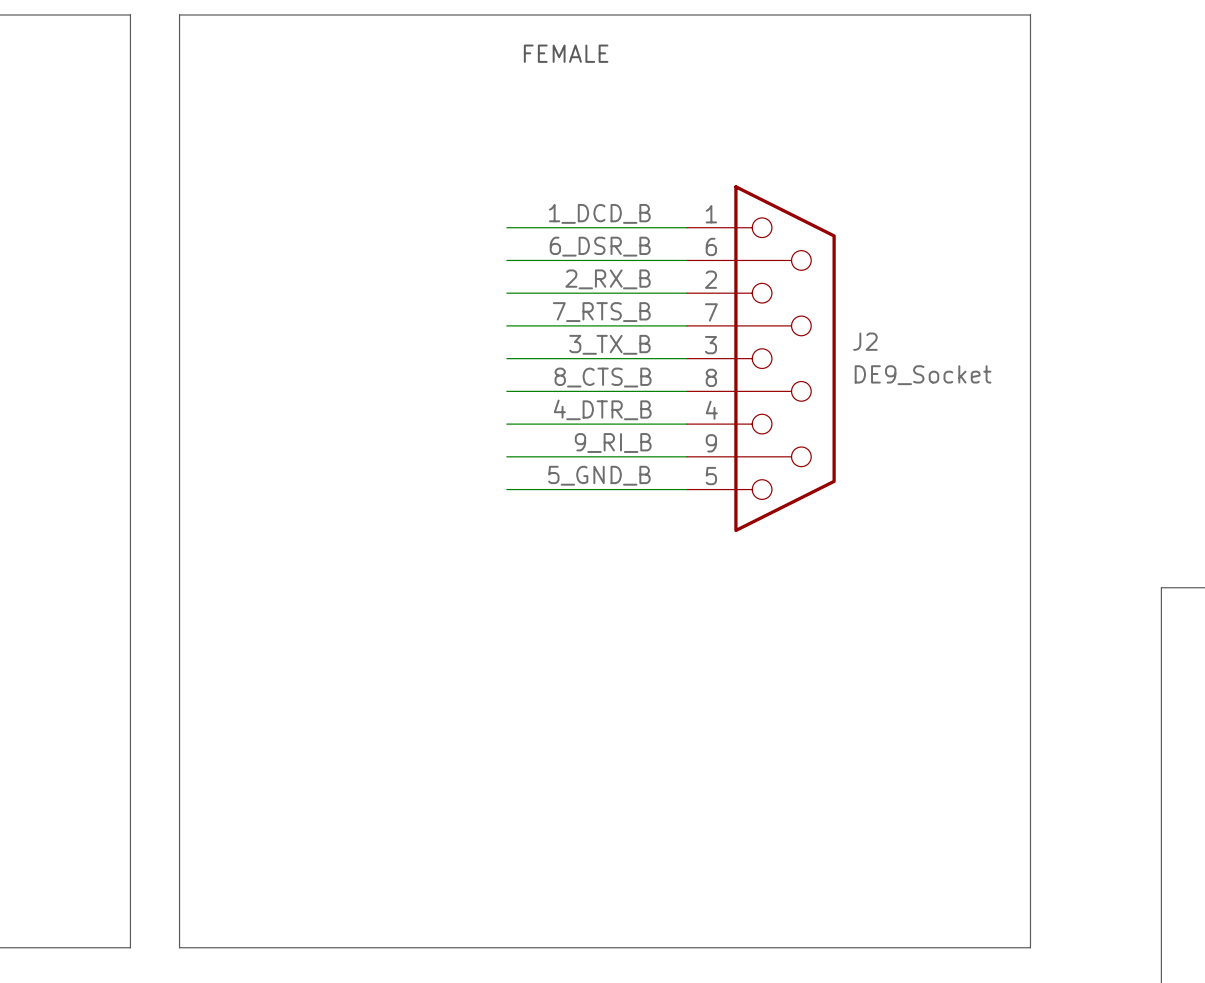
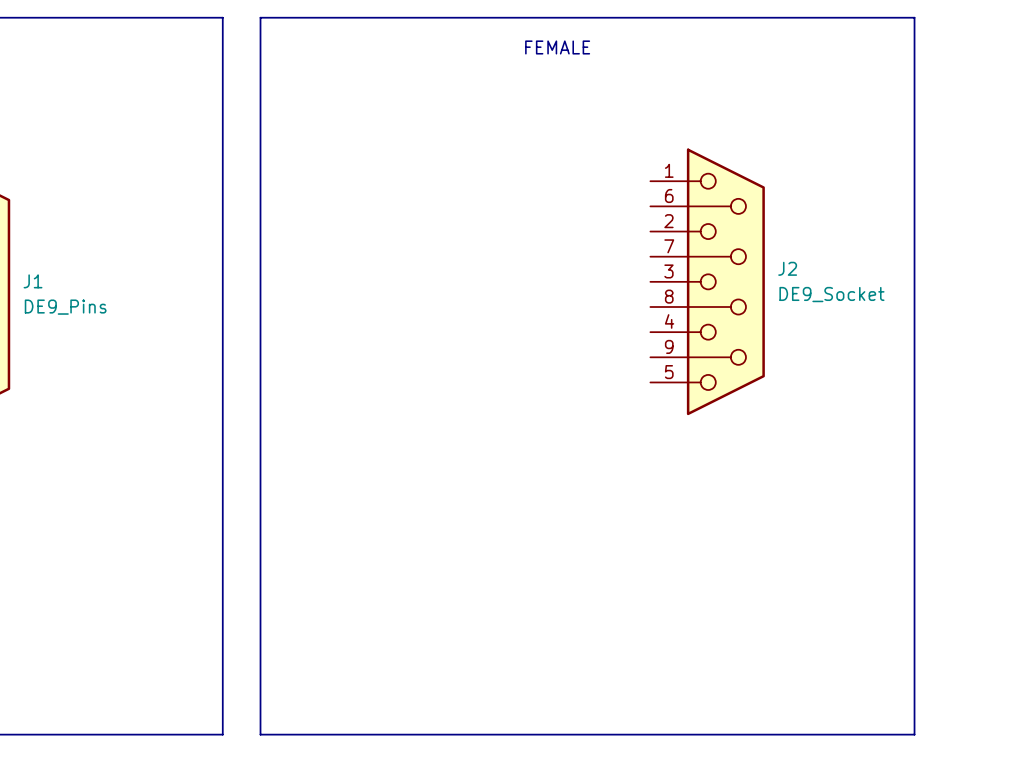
label: 1_DCD_B (599, 213) -> none
wire: (506, 227) (686, 227) -> none
label: 6_DSR_B (600, 246) -> none
wire: (506, 260) (686, 260) -> none
label: 2_RX_B (608, 279) -> none
wire: (506, 293) (686, 293) -> none
label: 7_RTS_B (601, 312) -> none
wire: (506, 325) (686, 325) -> none
label: 3_TX_B (609, 344) -> none
wire: (506, 358) (686, 358) -> none
label: 8_CTS_B (603, 377) -> none
wire: (506, 391) (686, 391) -> none
label: 4_DTR_B (602, 409) -> none
wire: (506, 424) (686, 424) -> none
label: 9_RI_B (613, 443) -> none
wire: (506, 456) (686, 456) -> none
label: 5_GND_B (599, 475) -> none
wire: (506, 489) (686, 489) -> none

